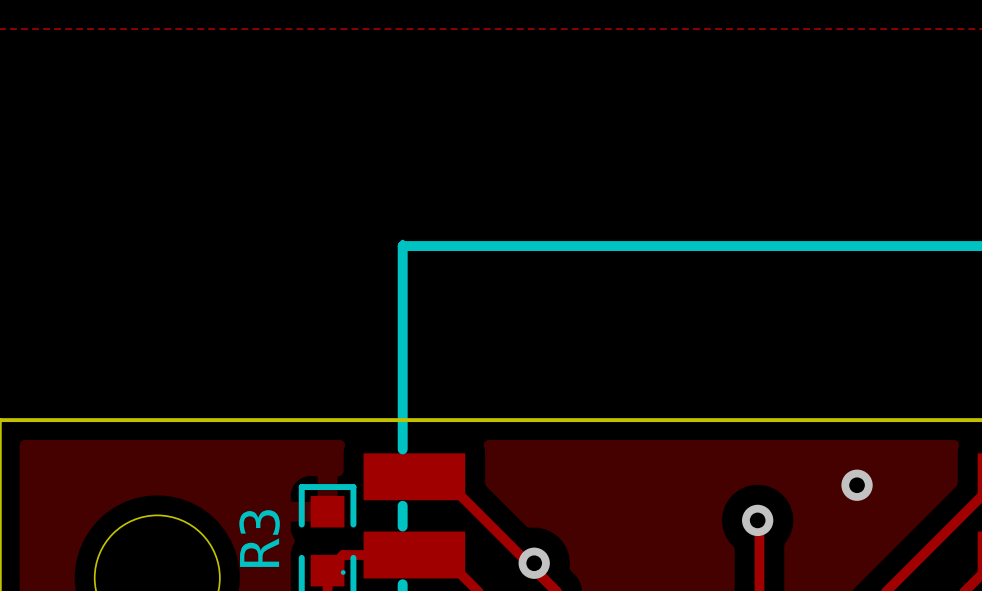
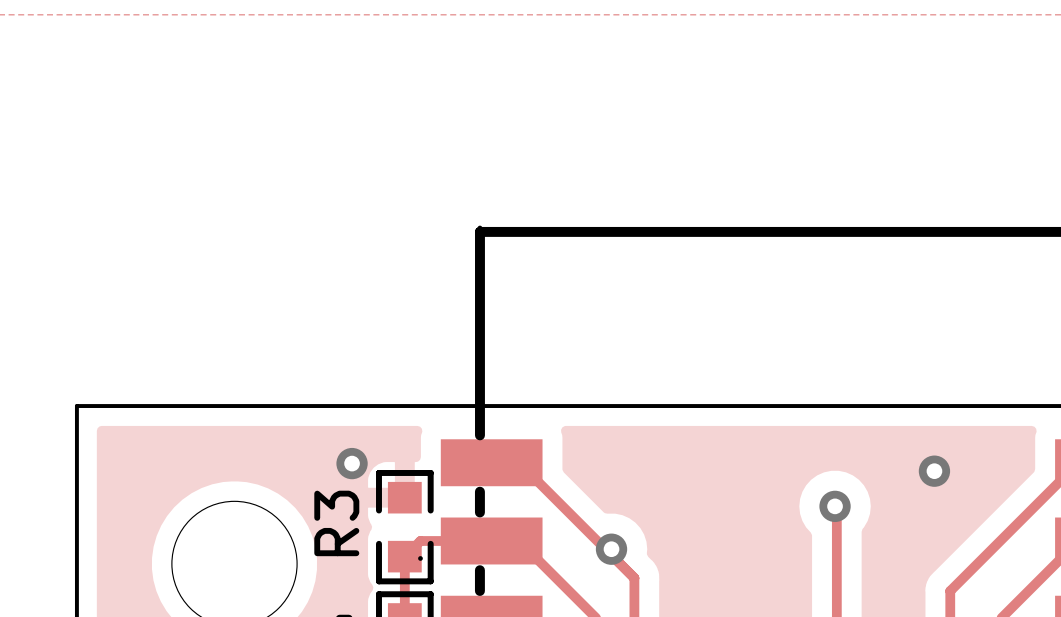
via: none -> (352, 463)

